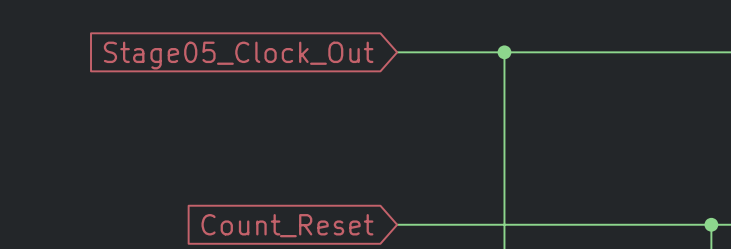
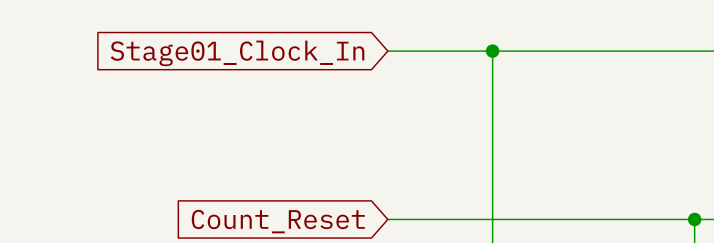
global label: Stage05_Clock_Out (238, 55) -> Stage01_Clock_In (237, 53)

